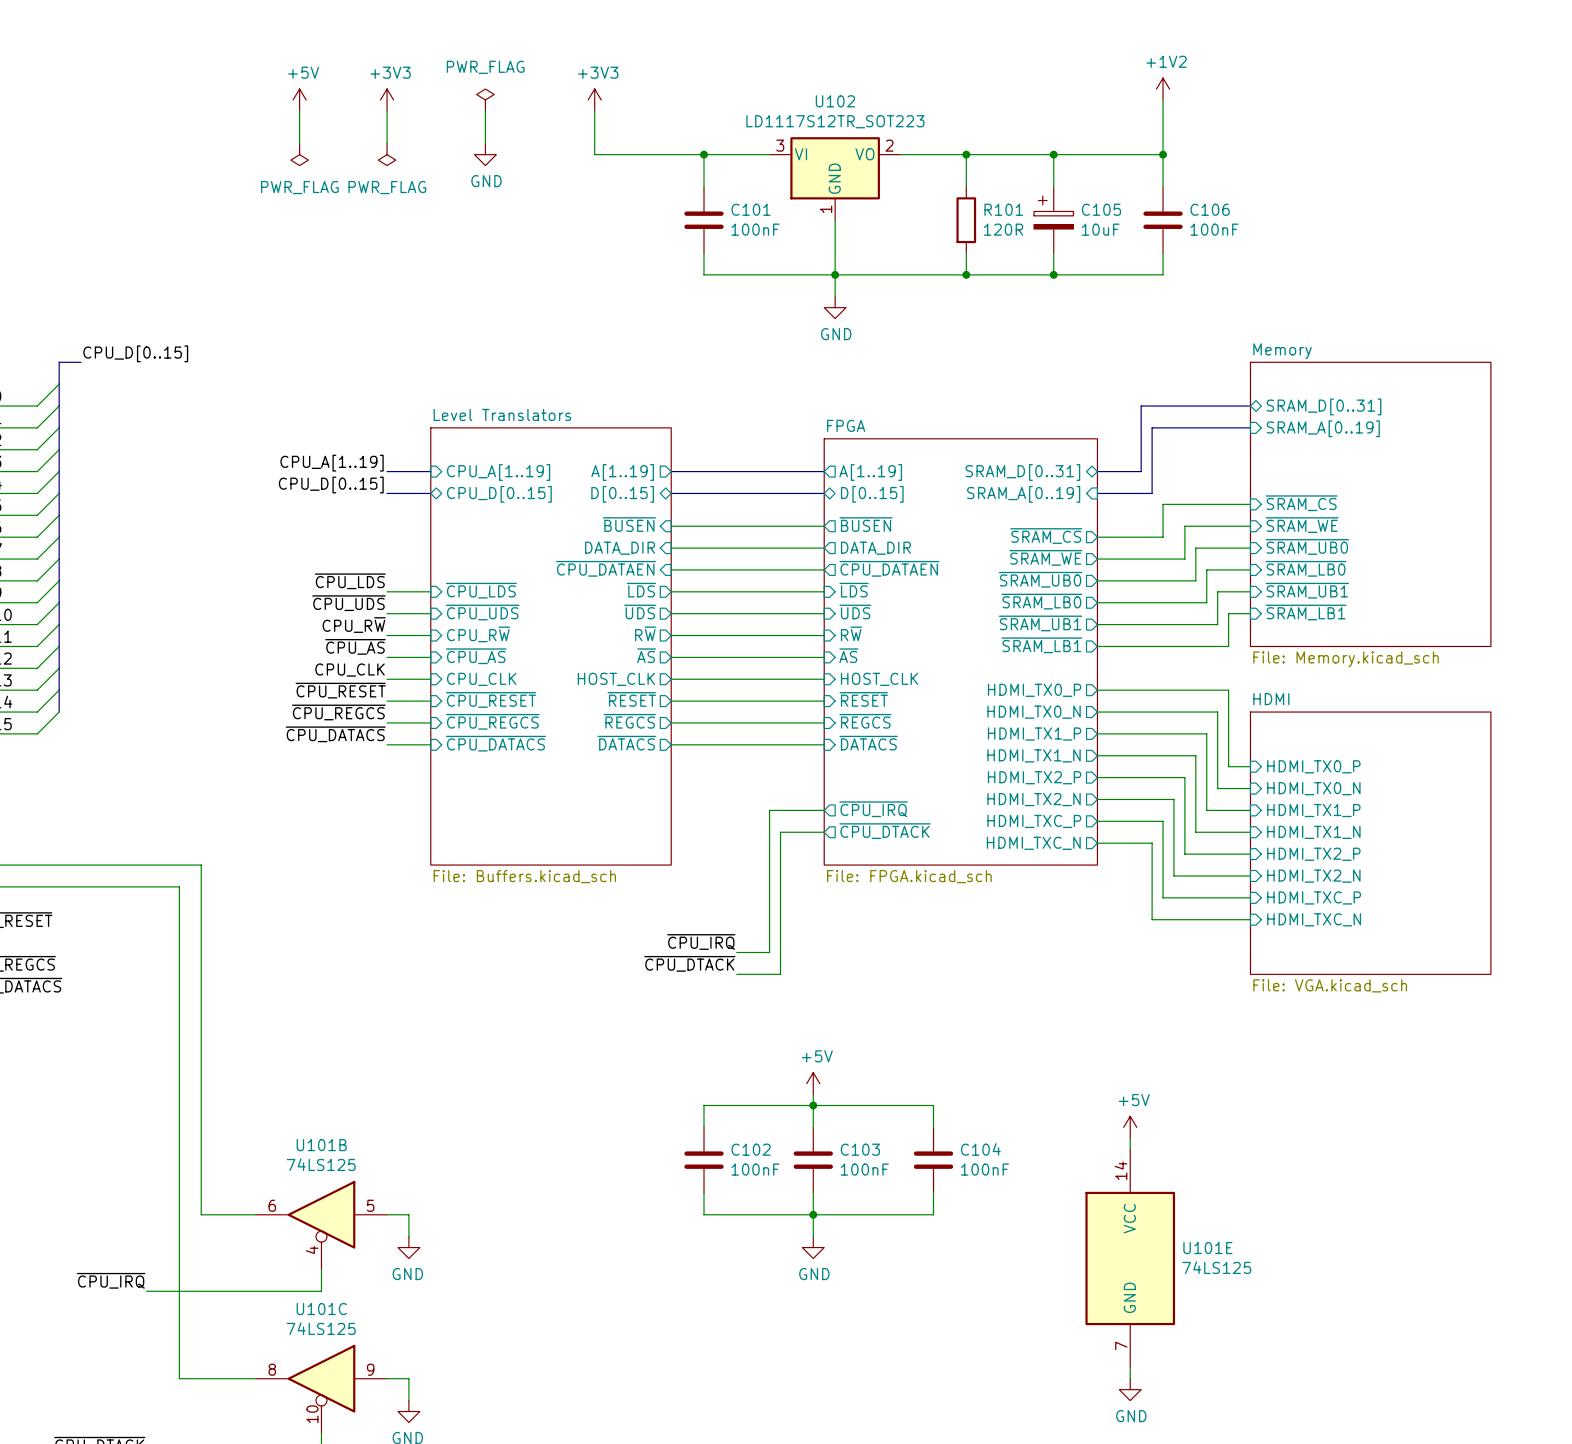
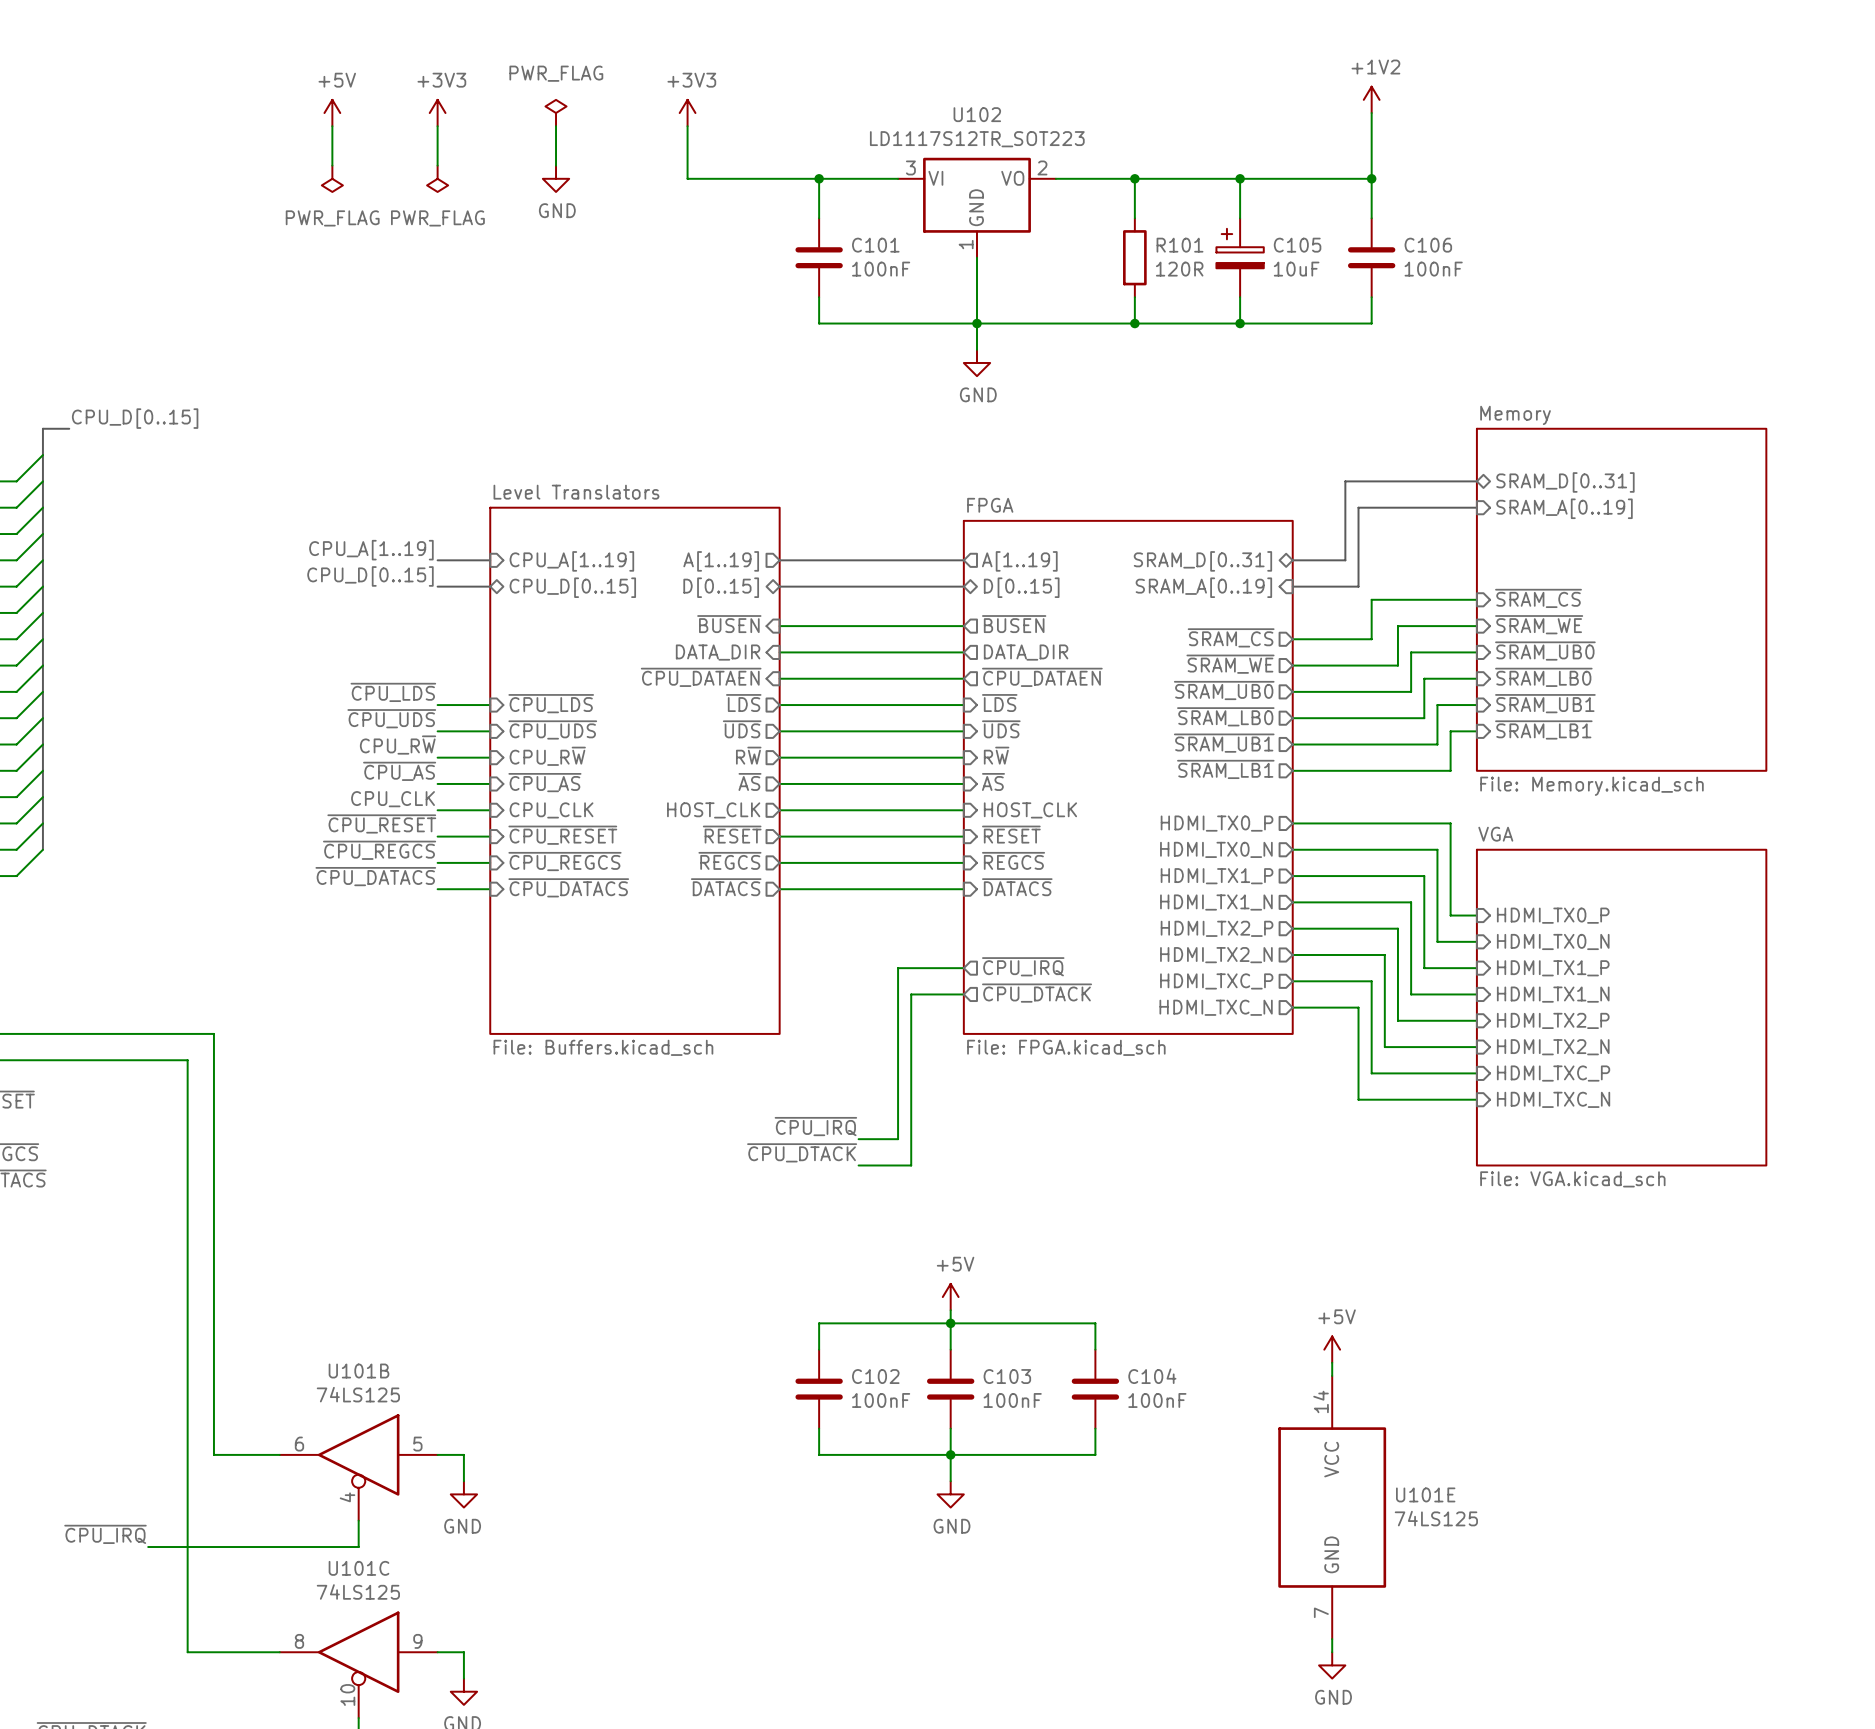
sheet HDMI name: HDMI (1271, 699) -> VGA (1495, 834)

